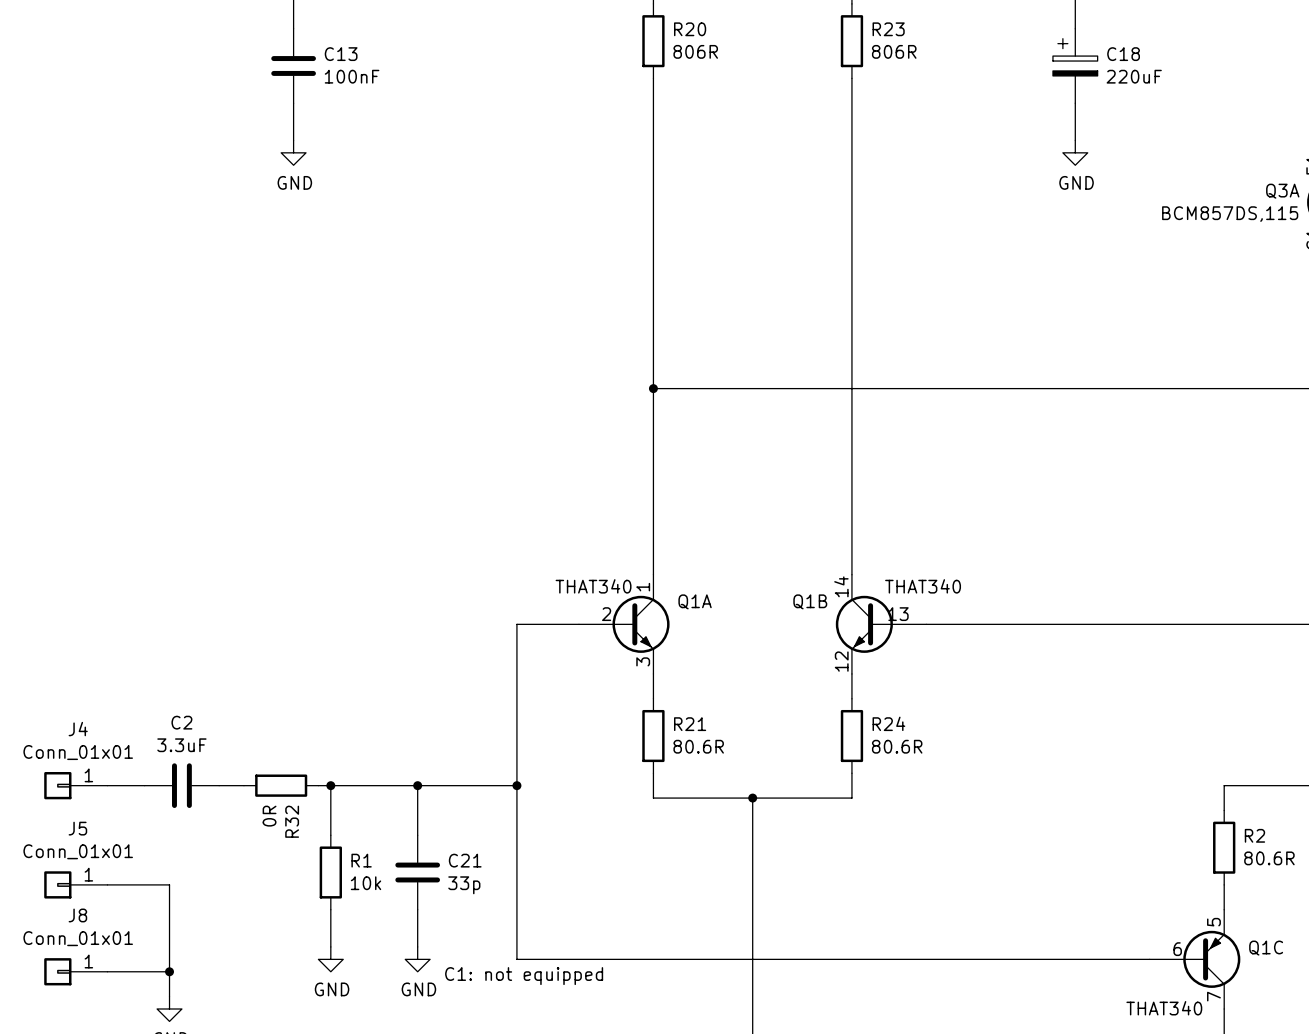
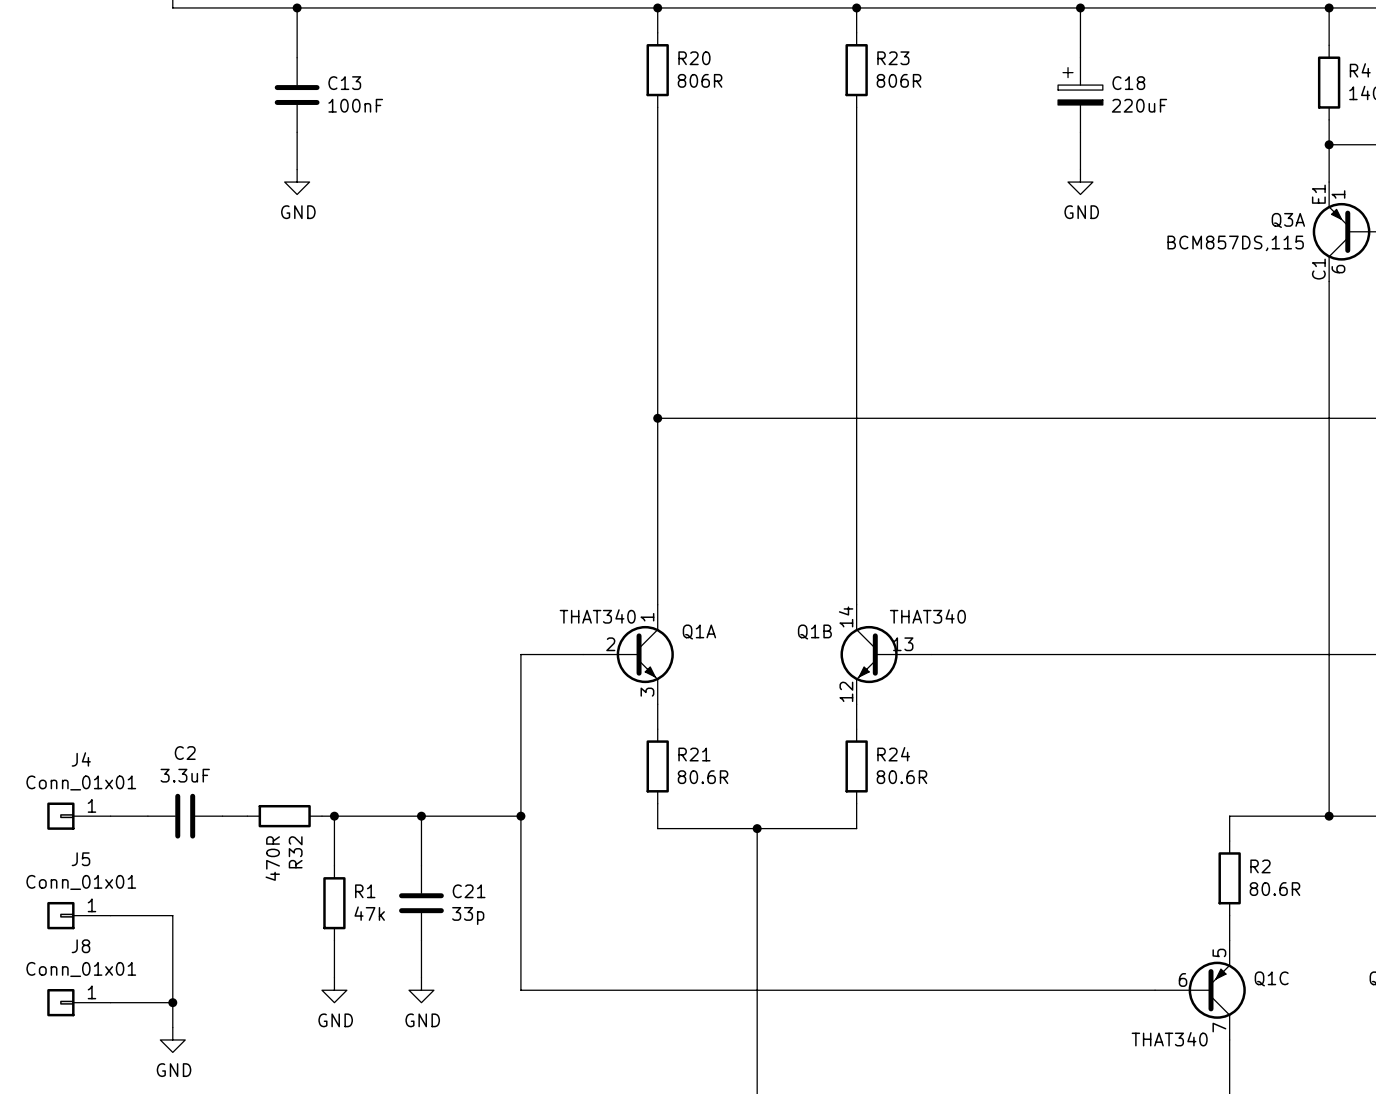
R32 value: 0R (269, 816) -> 470R (272, 858)
R1 value: 10k (366, 883) -> 47k (369, 913)
text: C1: not equipped (524, 976) -> none

